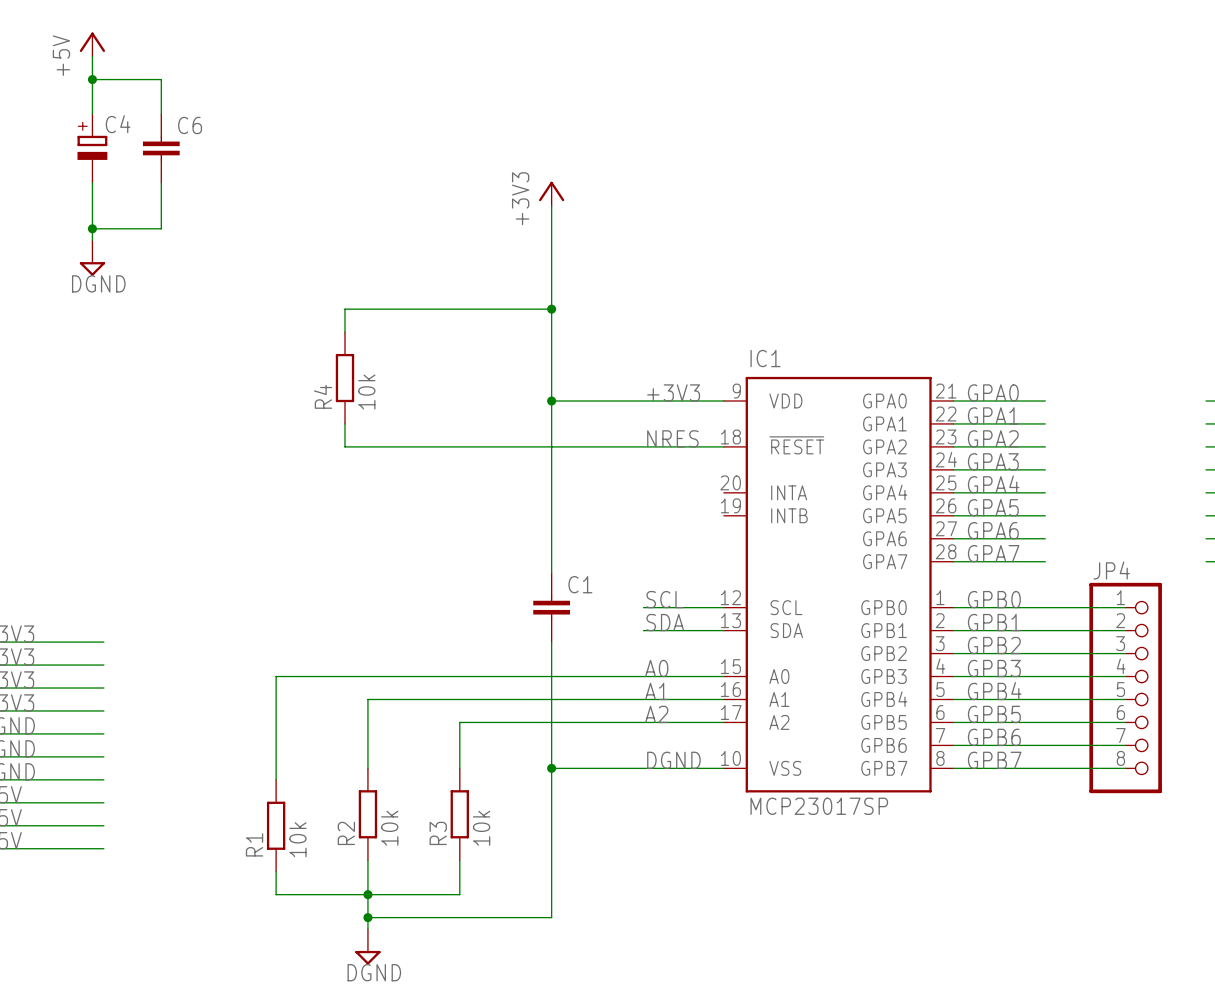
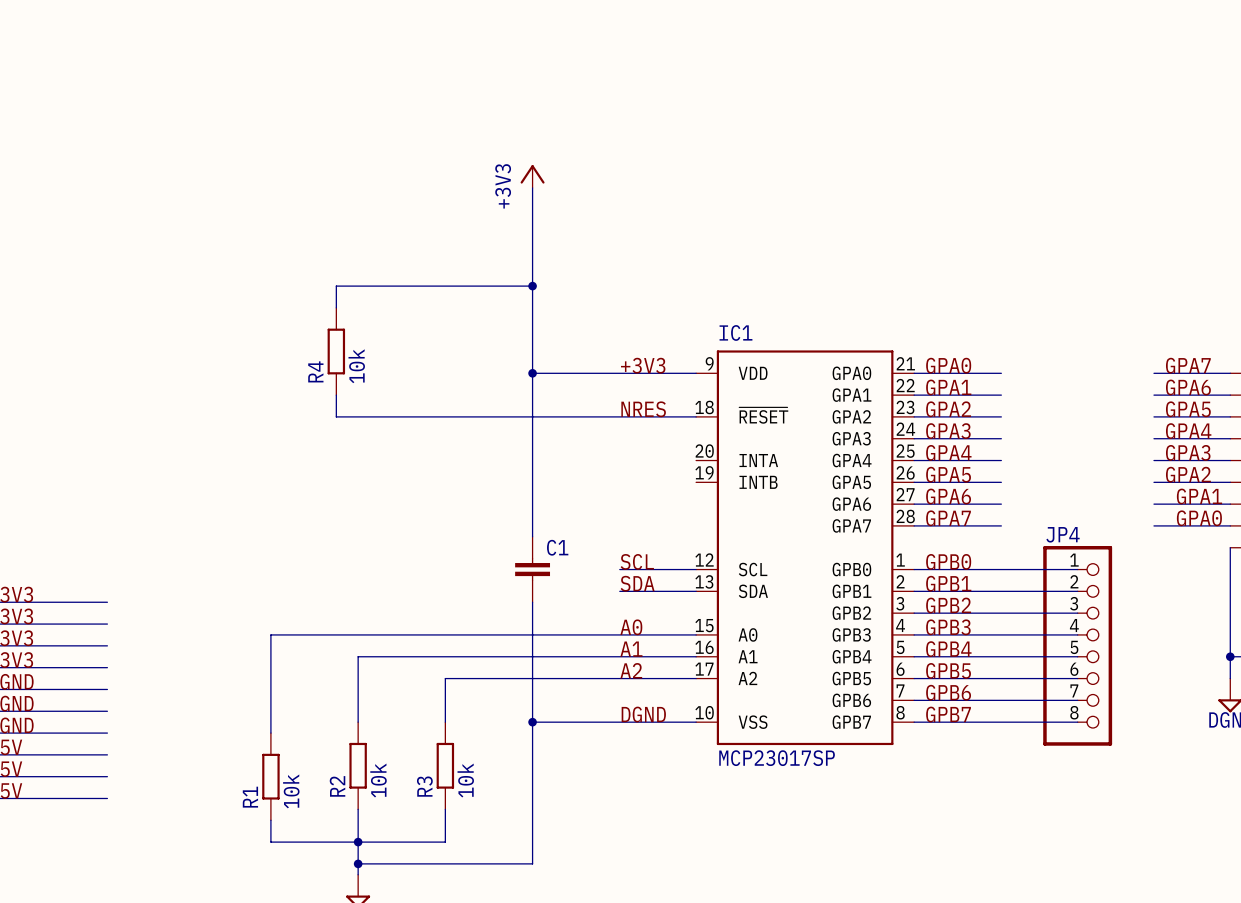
power symbol: +5V (92, 44) -> none
wire: (92, 56) (92, 113) -> none
wire: (92, 79) (161, 79) (161, 113) -> none
junction: (92, 79) -> none
C4: (92, 148) -> none
C6: (161, 148) -> none
wire: (92, 182) (92, 240) -> none
wire: (161, 182) (161, 228) (92, 228) -> none
junction: (92, 228) -> none
power symbol: DGND (92, 258) -> none

